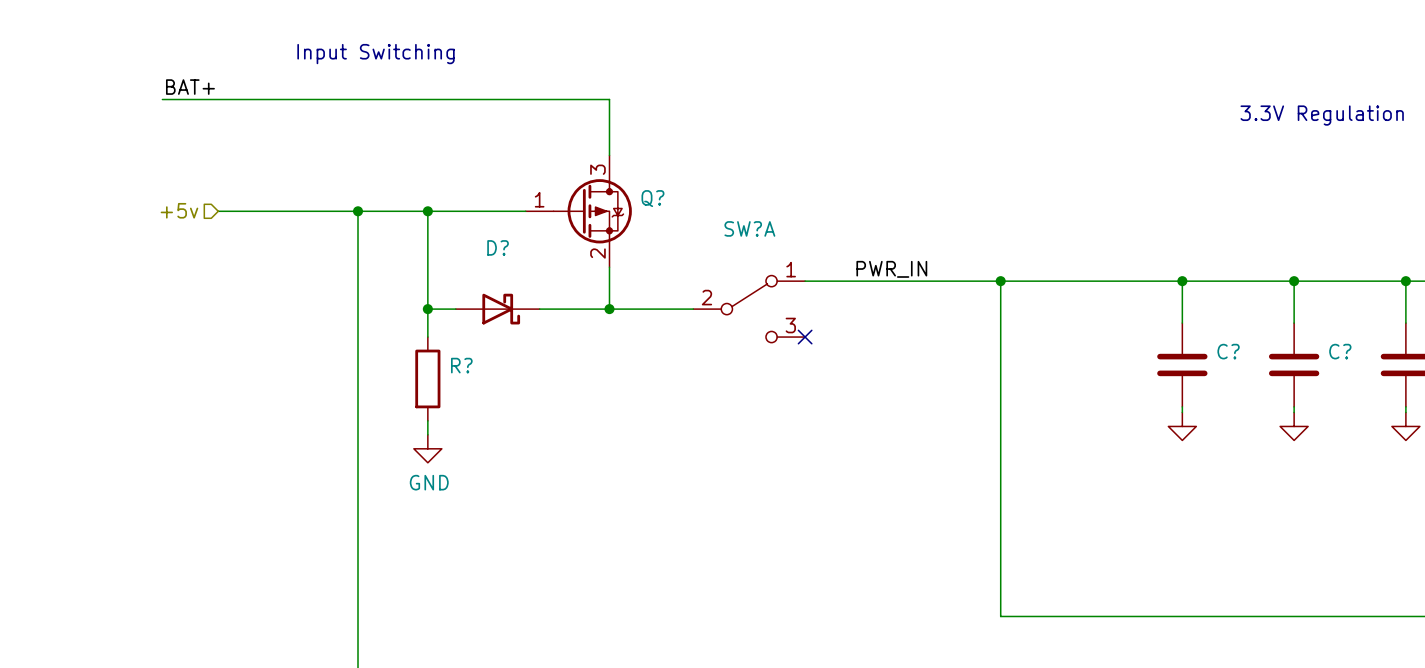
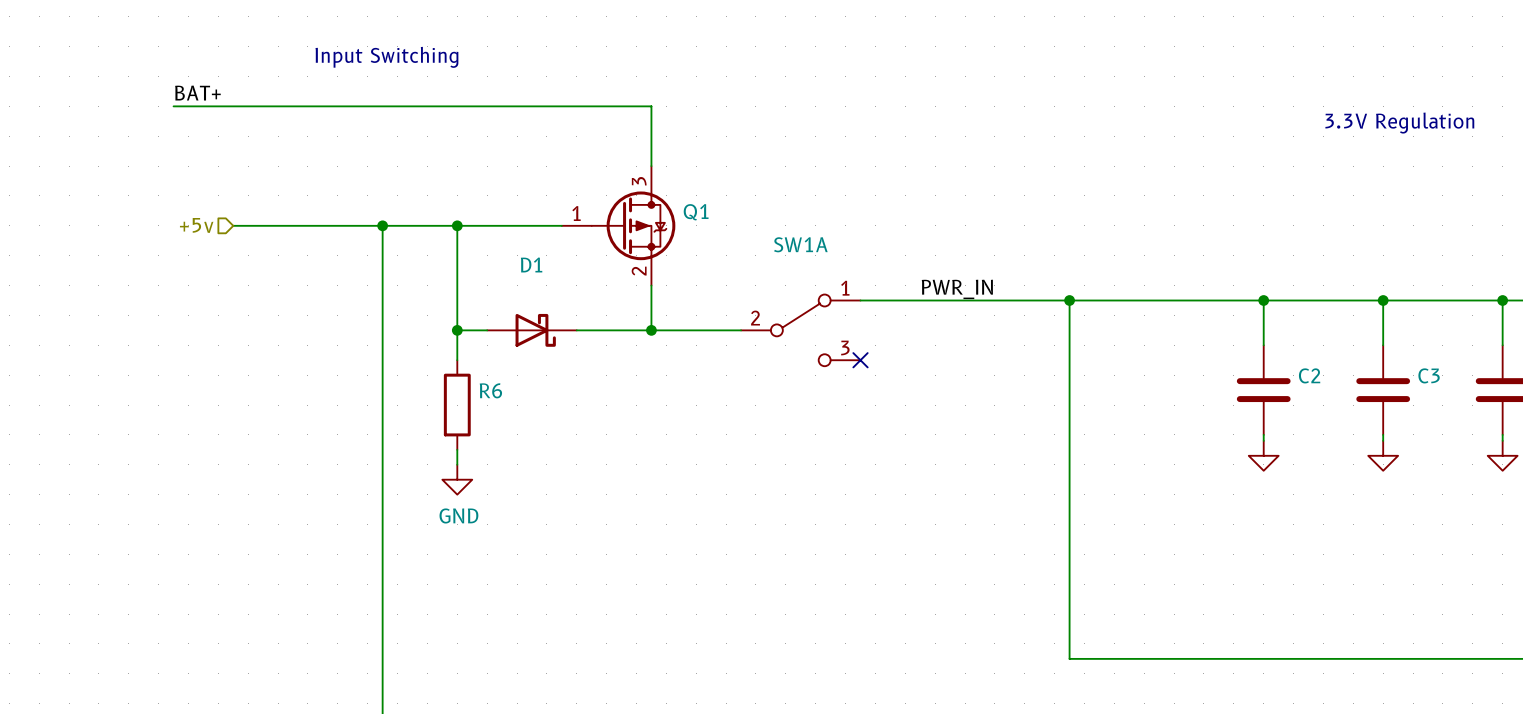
Q? name: Q? (652, 198) -> Q1 (696, 212)
SW?A name: SW?A (749, 228) -> SW1A (800, 244)
D? name: D? (498, 247) -> D1 (531, 265)
C? name: C? (1228, 351) -> C2 (1309, 375)
C? name: C? (1340, 351) -> C3 (1429, 375)
R? name: R? (461, 365) -> R6 (490, 390)

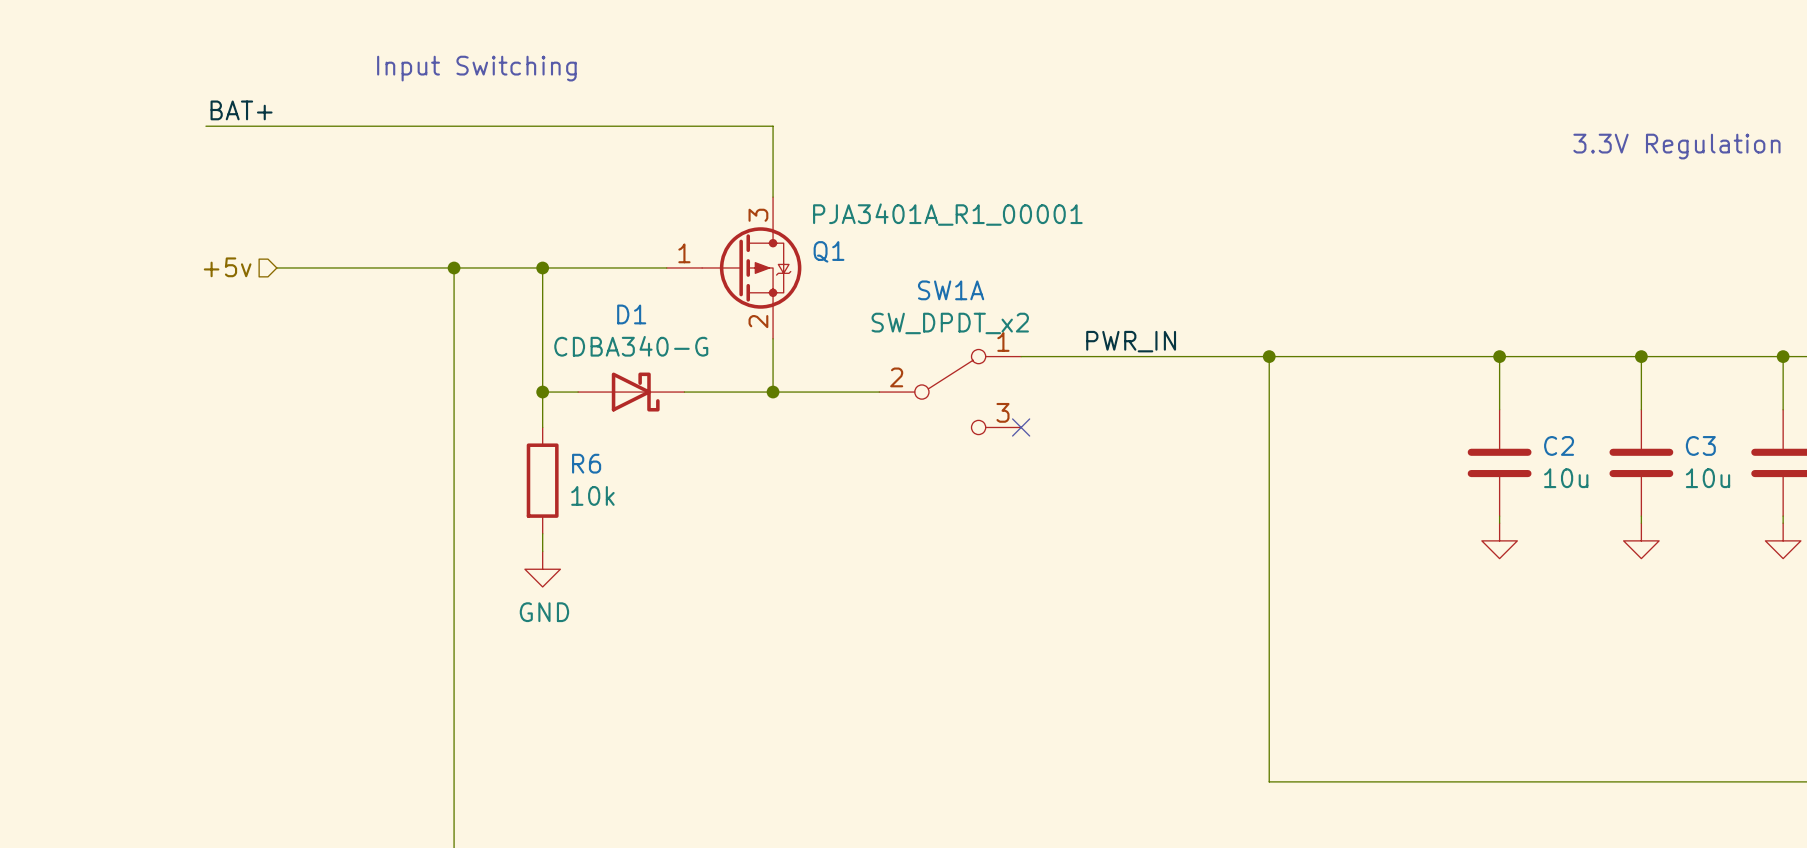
Q1 value: none -> PJA3401A_R1_00001 (947, 214)
SW1A value: none -> SW_DPDT_x2 (950, 323)
D1 value: none -> CDBA340-G (631, 346)
C2 value: none -> 10u (1566, 478)
C3 value: none -> 10u (1708, 478)
R6 value: none -> 10k (592, 495)

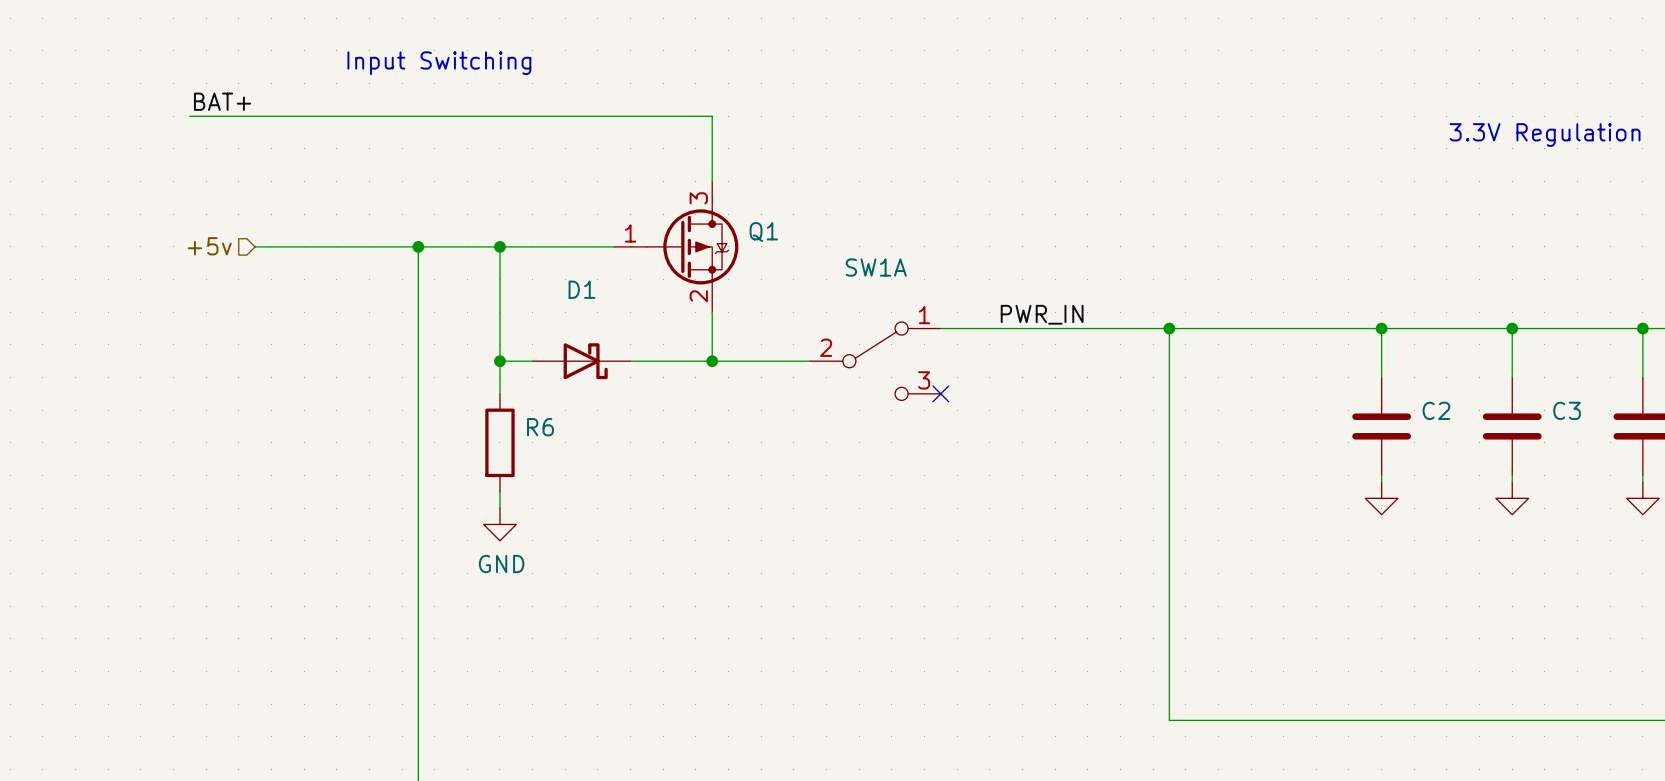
Q1 value: PJA3401A_R1_00001 (947, 214) -> none
SW1A value: SW_DPDT_x2 (950, 323) -> none
D1 value: CDBA340-G (631, 346) -> none
C2 value: 10u (1566, 478) -> none
C3 value: 10u (1708, 478) -> none
R6 value: 10k (592, 495) -> none

